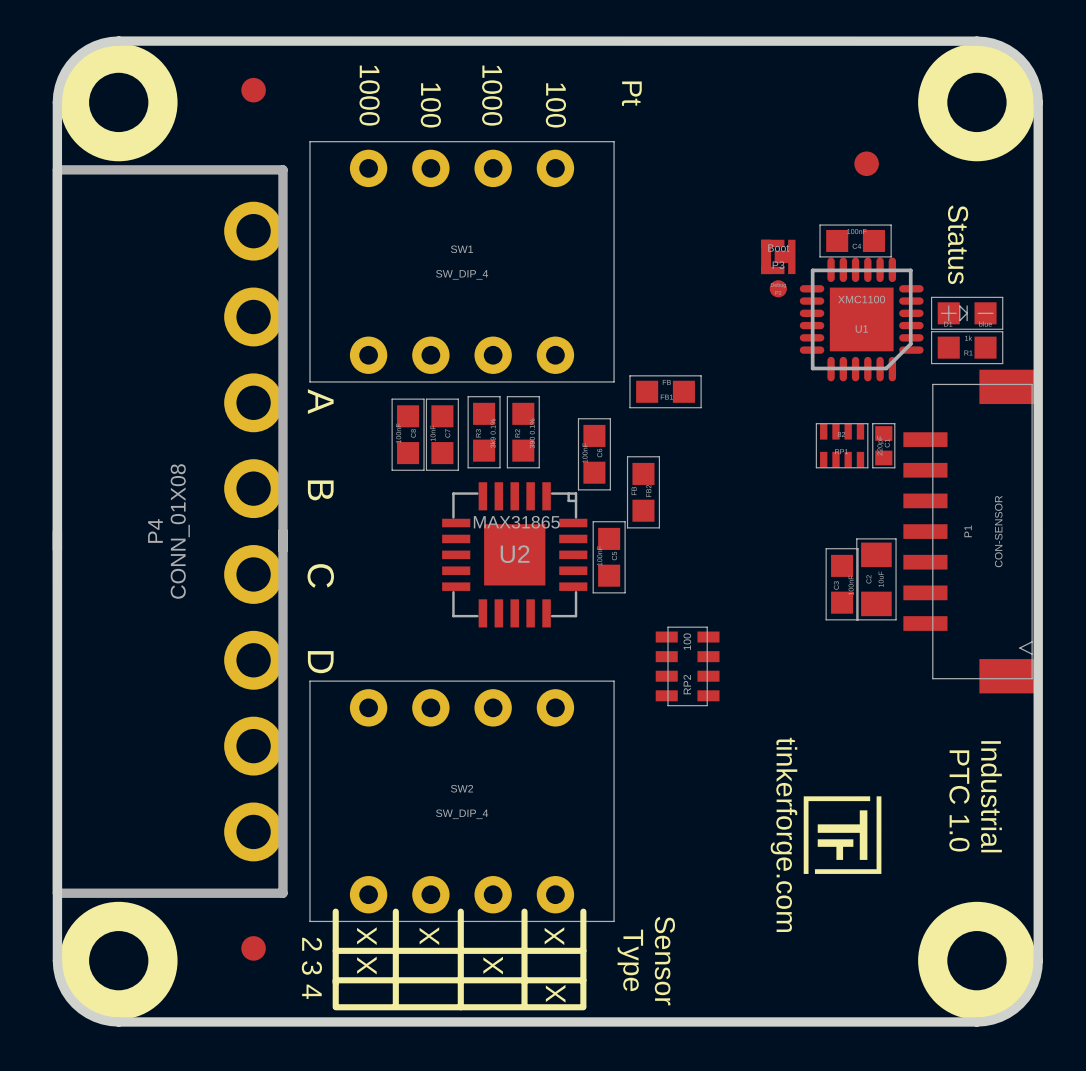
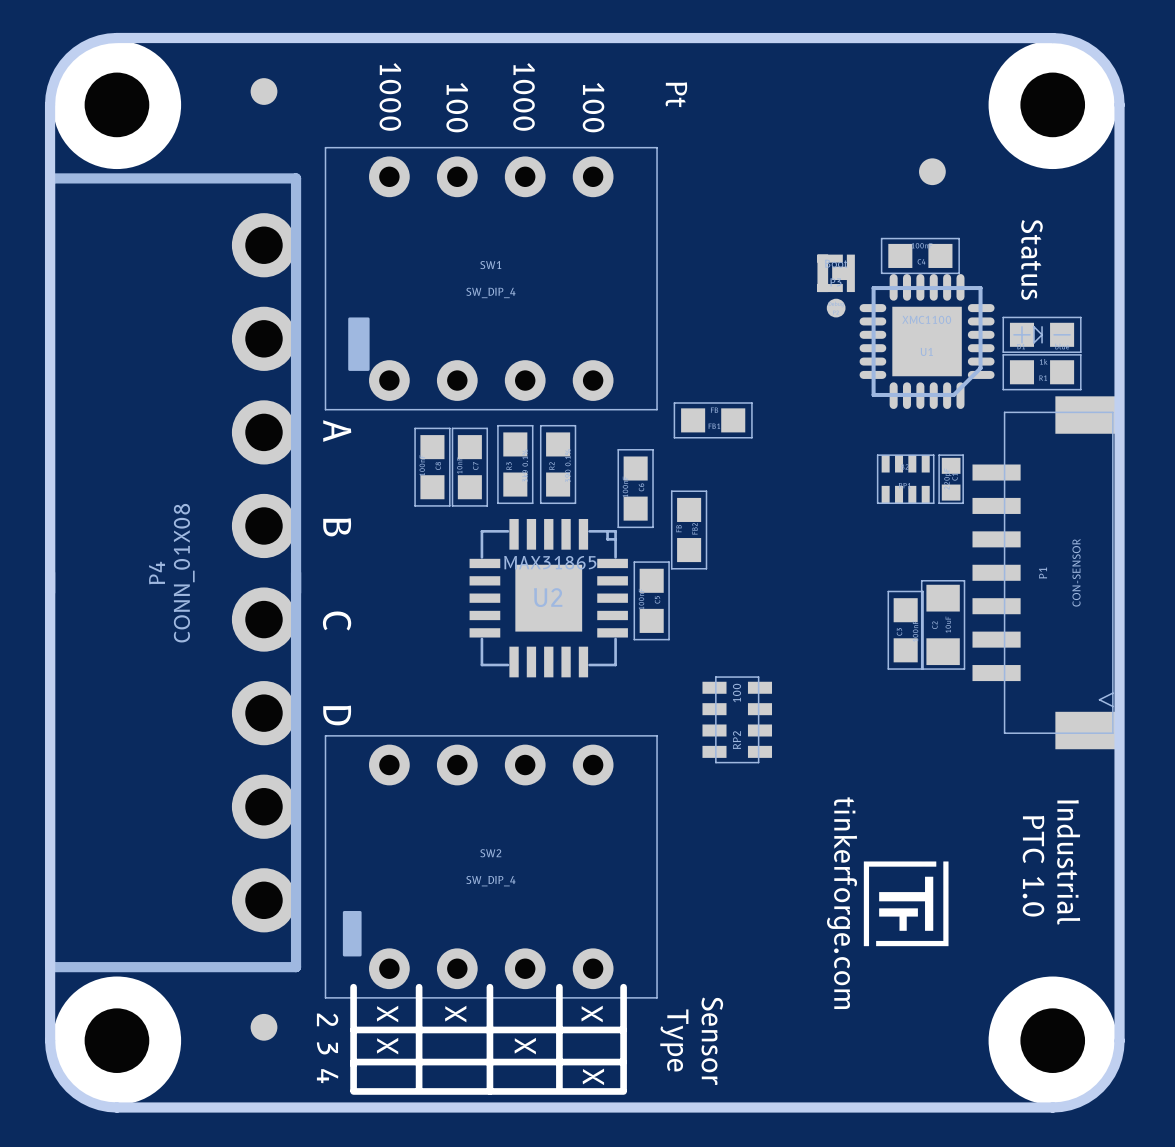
drawing: none -> [348, 317, 370, 371]
drawing: none -> [342, 910, 362, 957]

